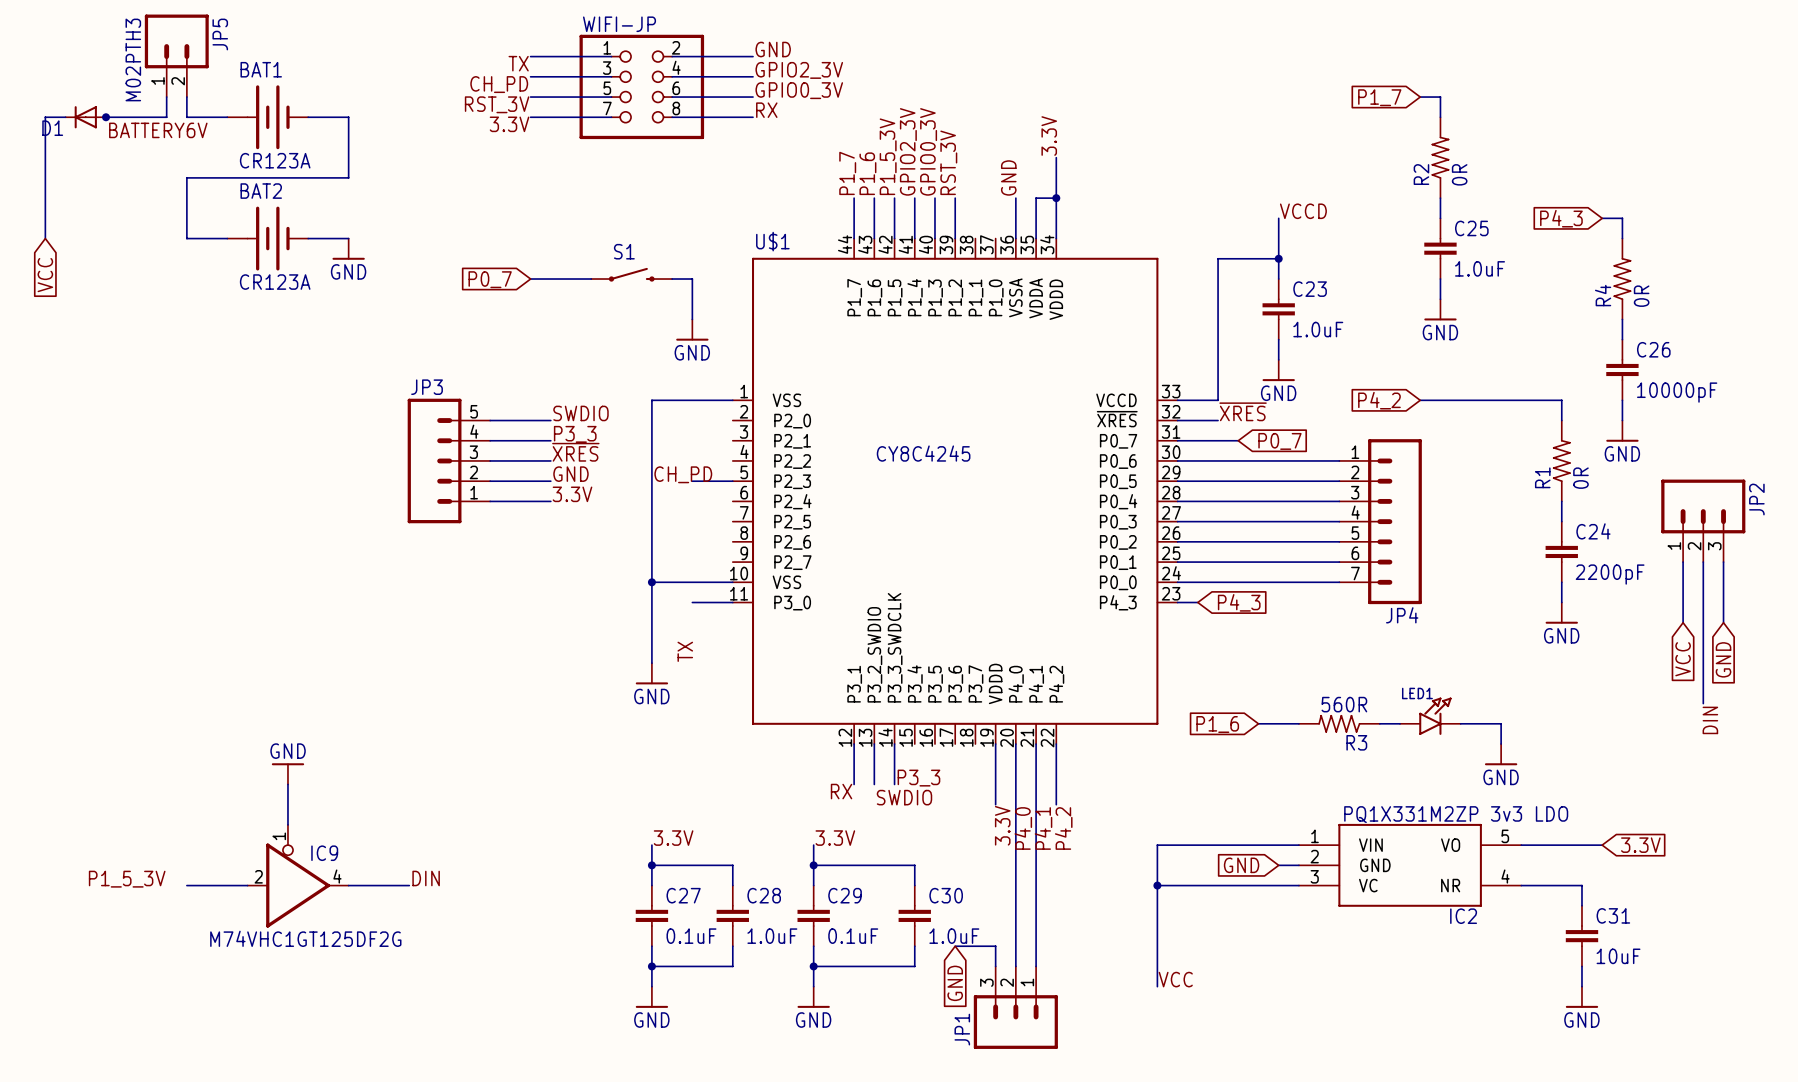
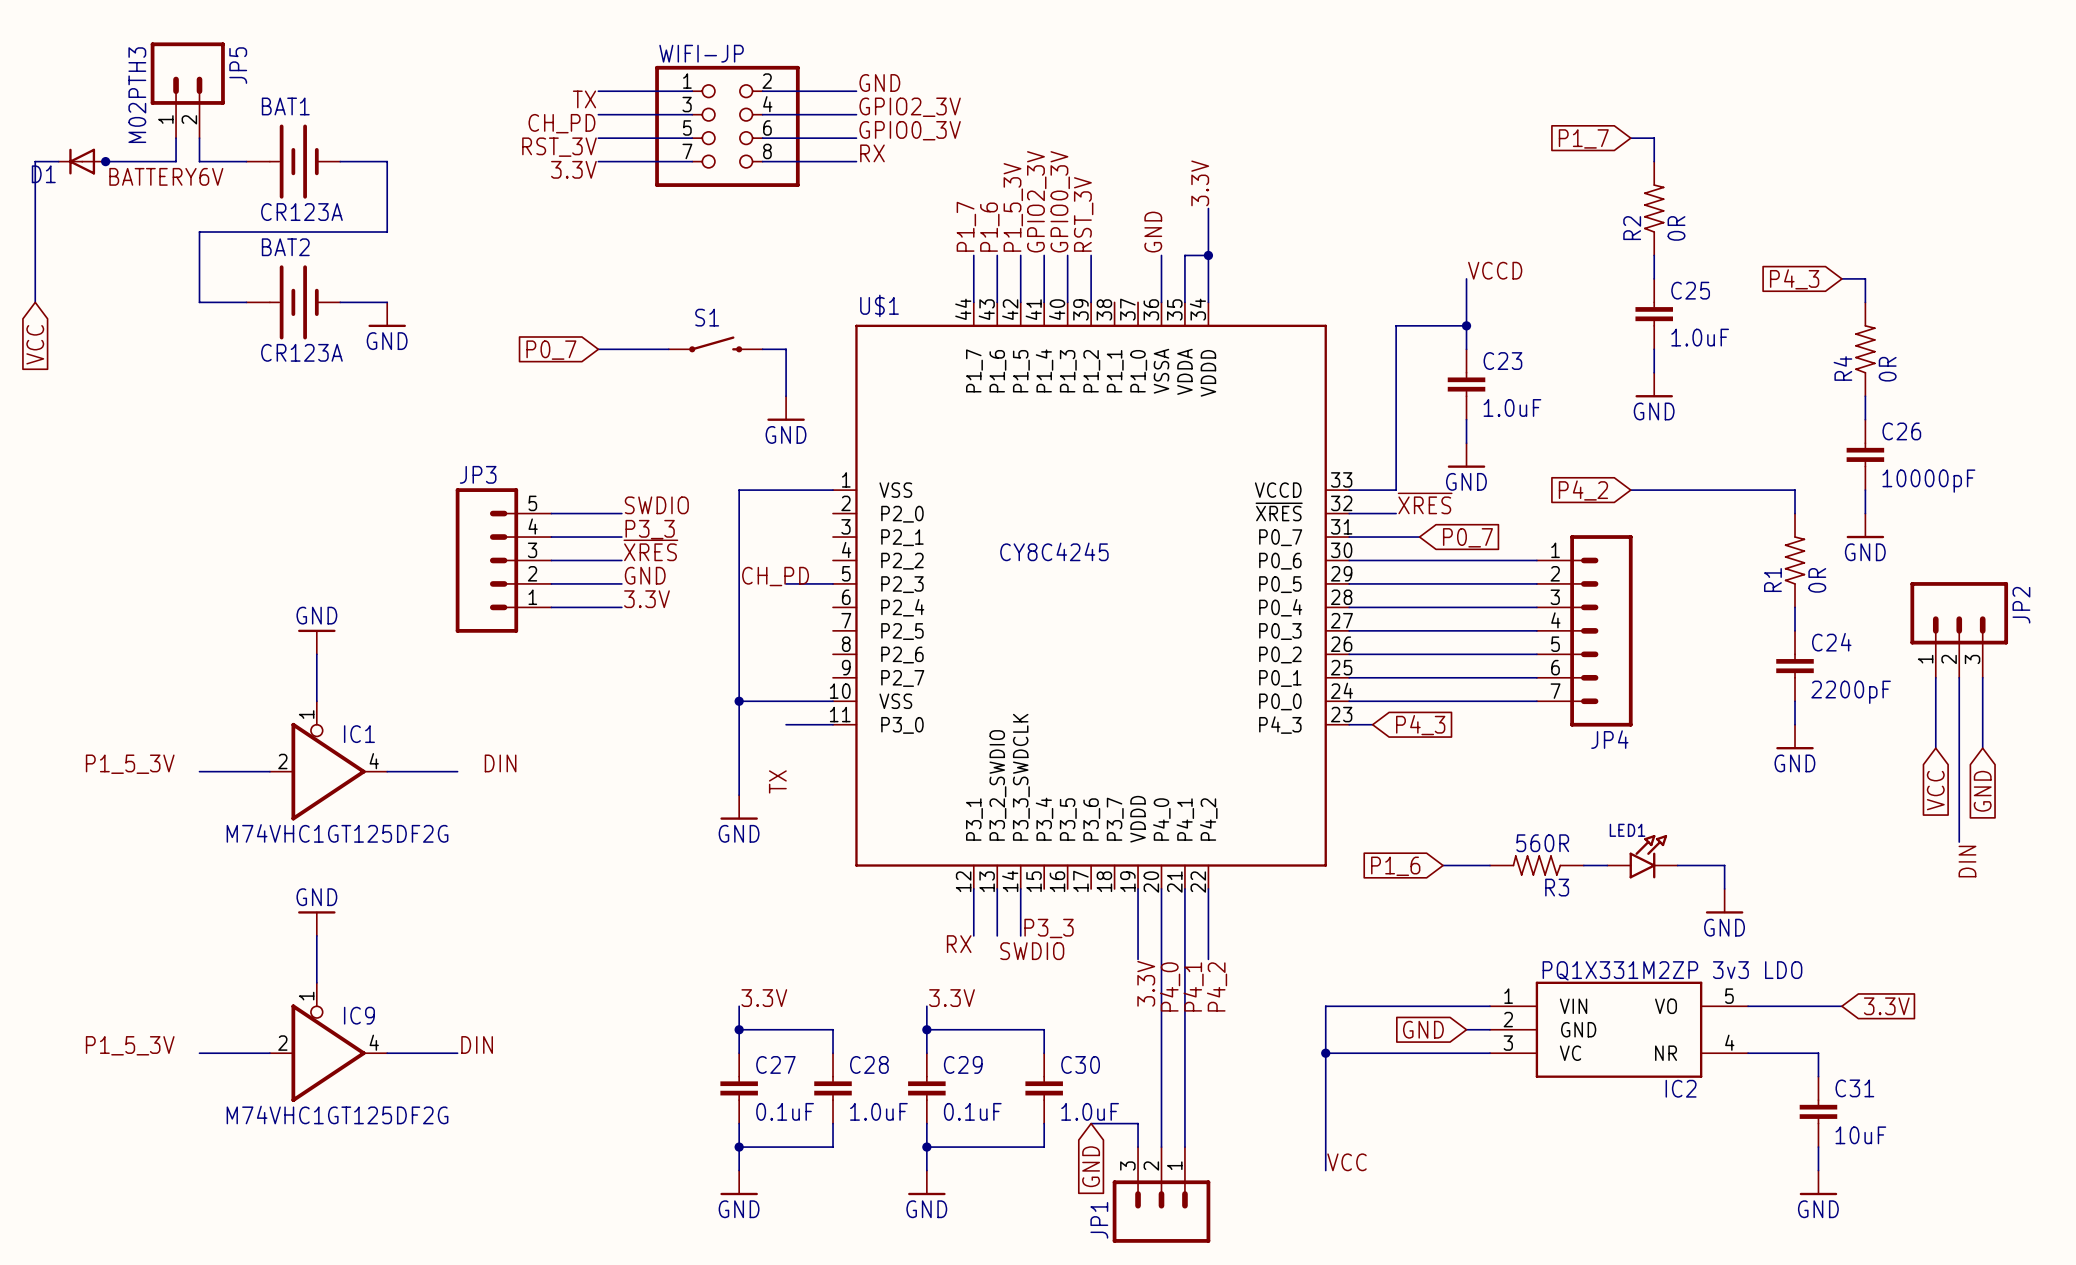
power symbol: none -> GND (316, 642)
wire: none -> (316, 654) (316, 701)
IC1: none -> M74VHC1GT125DF2G (328, 760)
label: none -> DIN (500, 763)
label: none -> P1_5_3V (130, 764)
wire: none -> (199, 771) (269, 771)
wire: none -> (387, 771) (457, 771)

